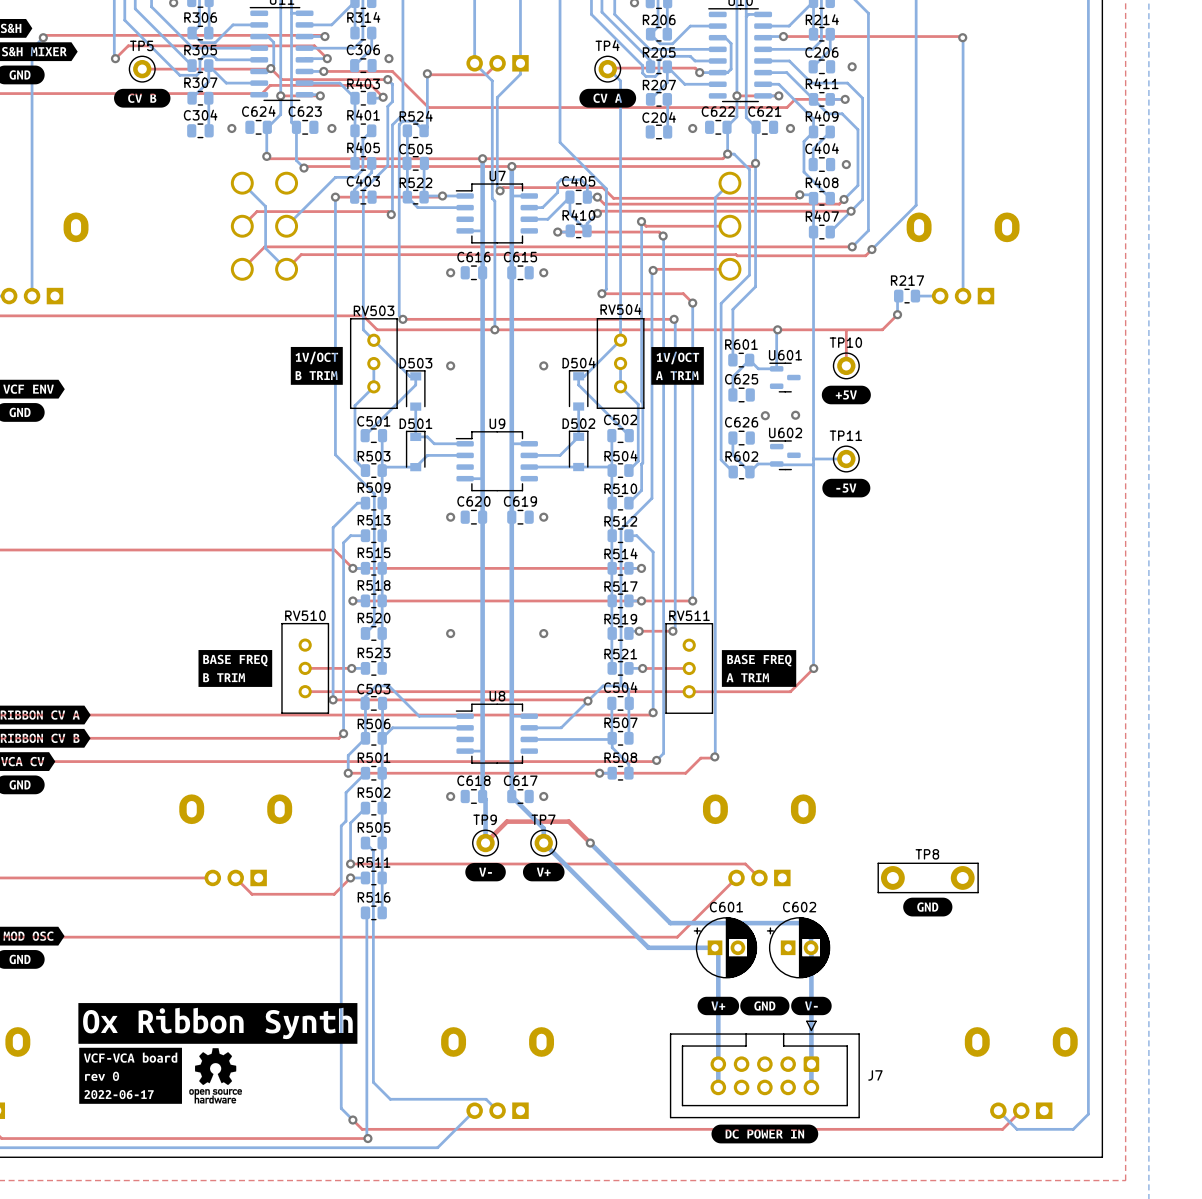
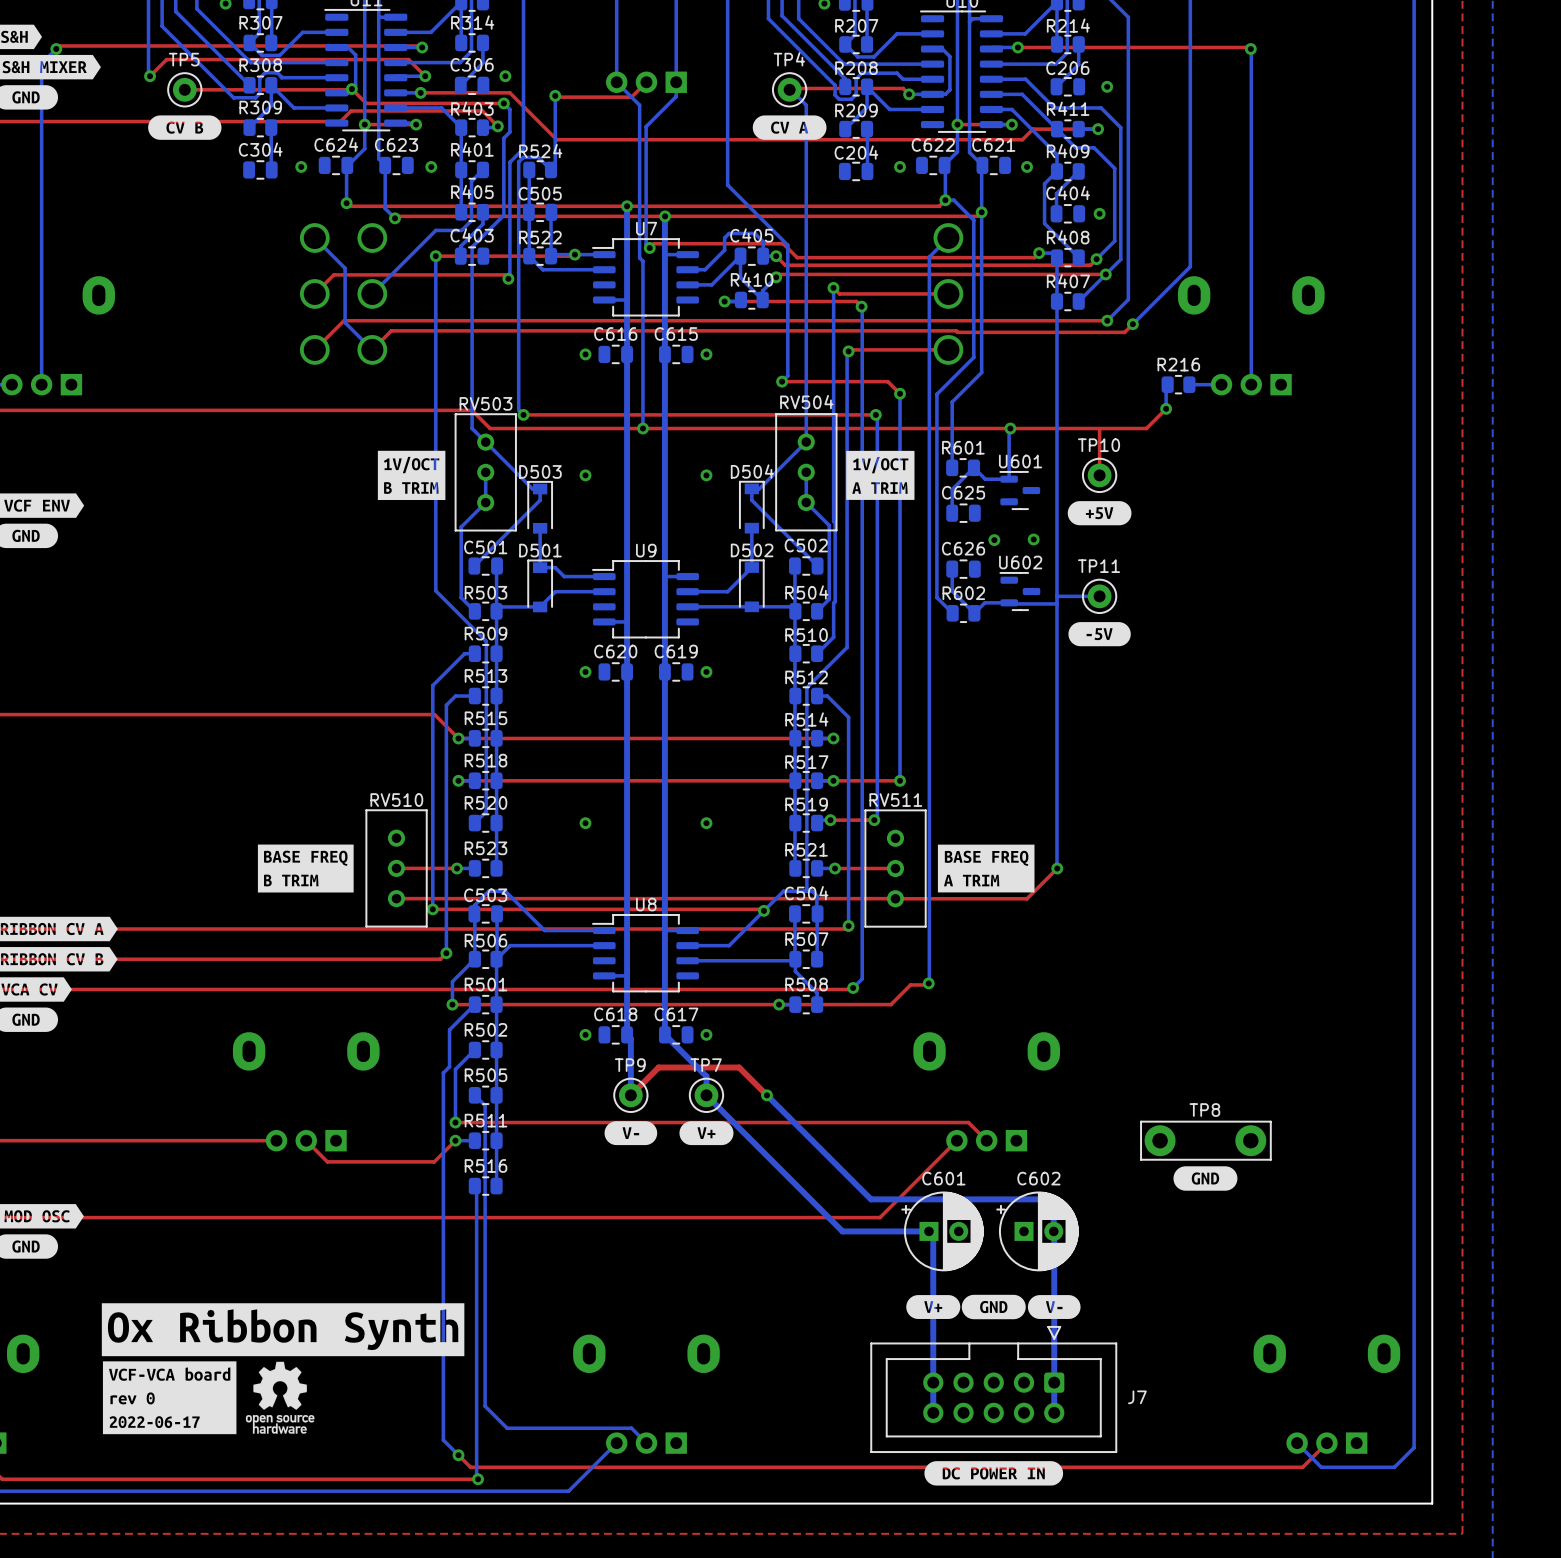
R306 name: R306 (200, 17) -> R307 (260, 22)
R206 name: R206 (659, 19) -> R207 (856, 25)
R305 name: R305 (200, 50) -> R308 (260, 65)
R205 name: R205 (659, 52) -> R208 (856, 68)
R307 name: R307 (200, 82) -> R309 (260, 107)
R207 name: R207 (659, 85) -> R209 (856, 110)
R217 name: R217 (907, 280) -> R216 (1178, 364)

